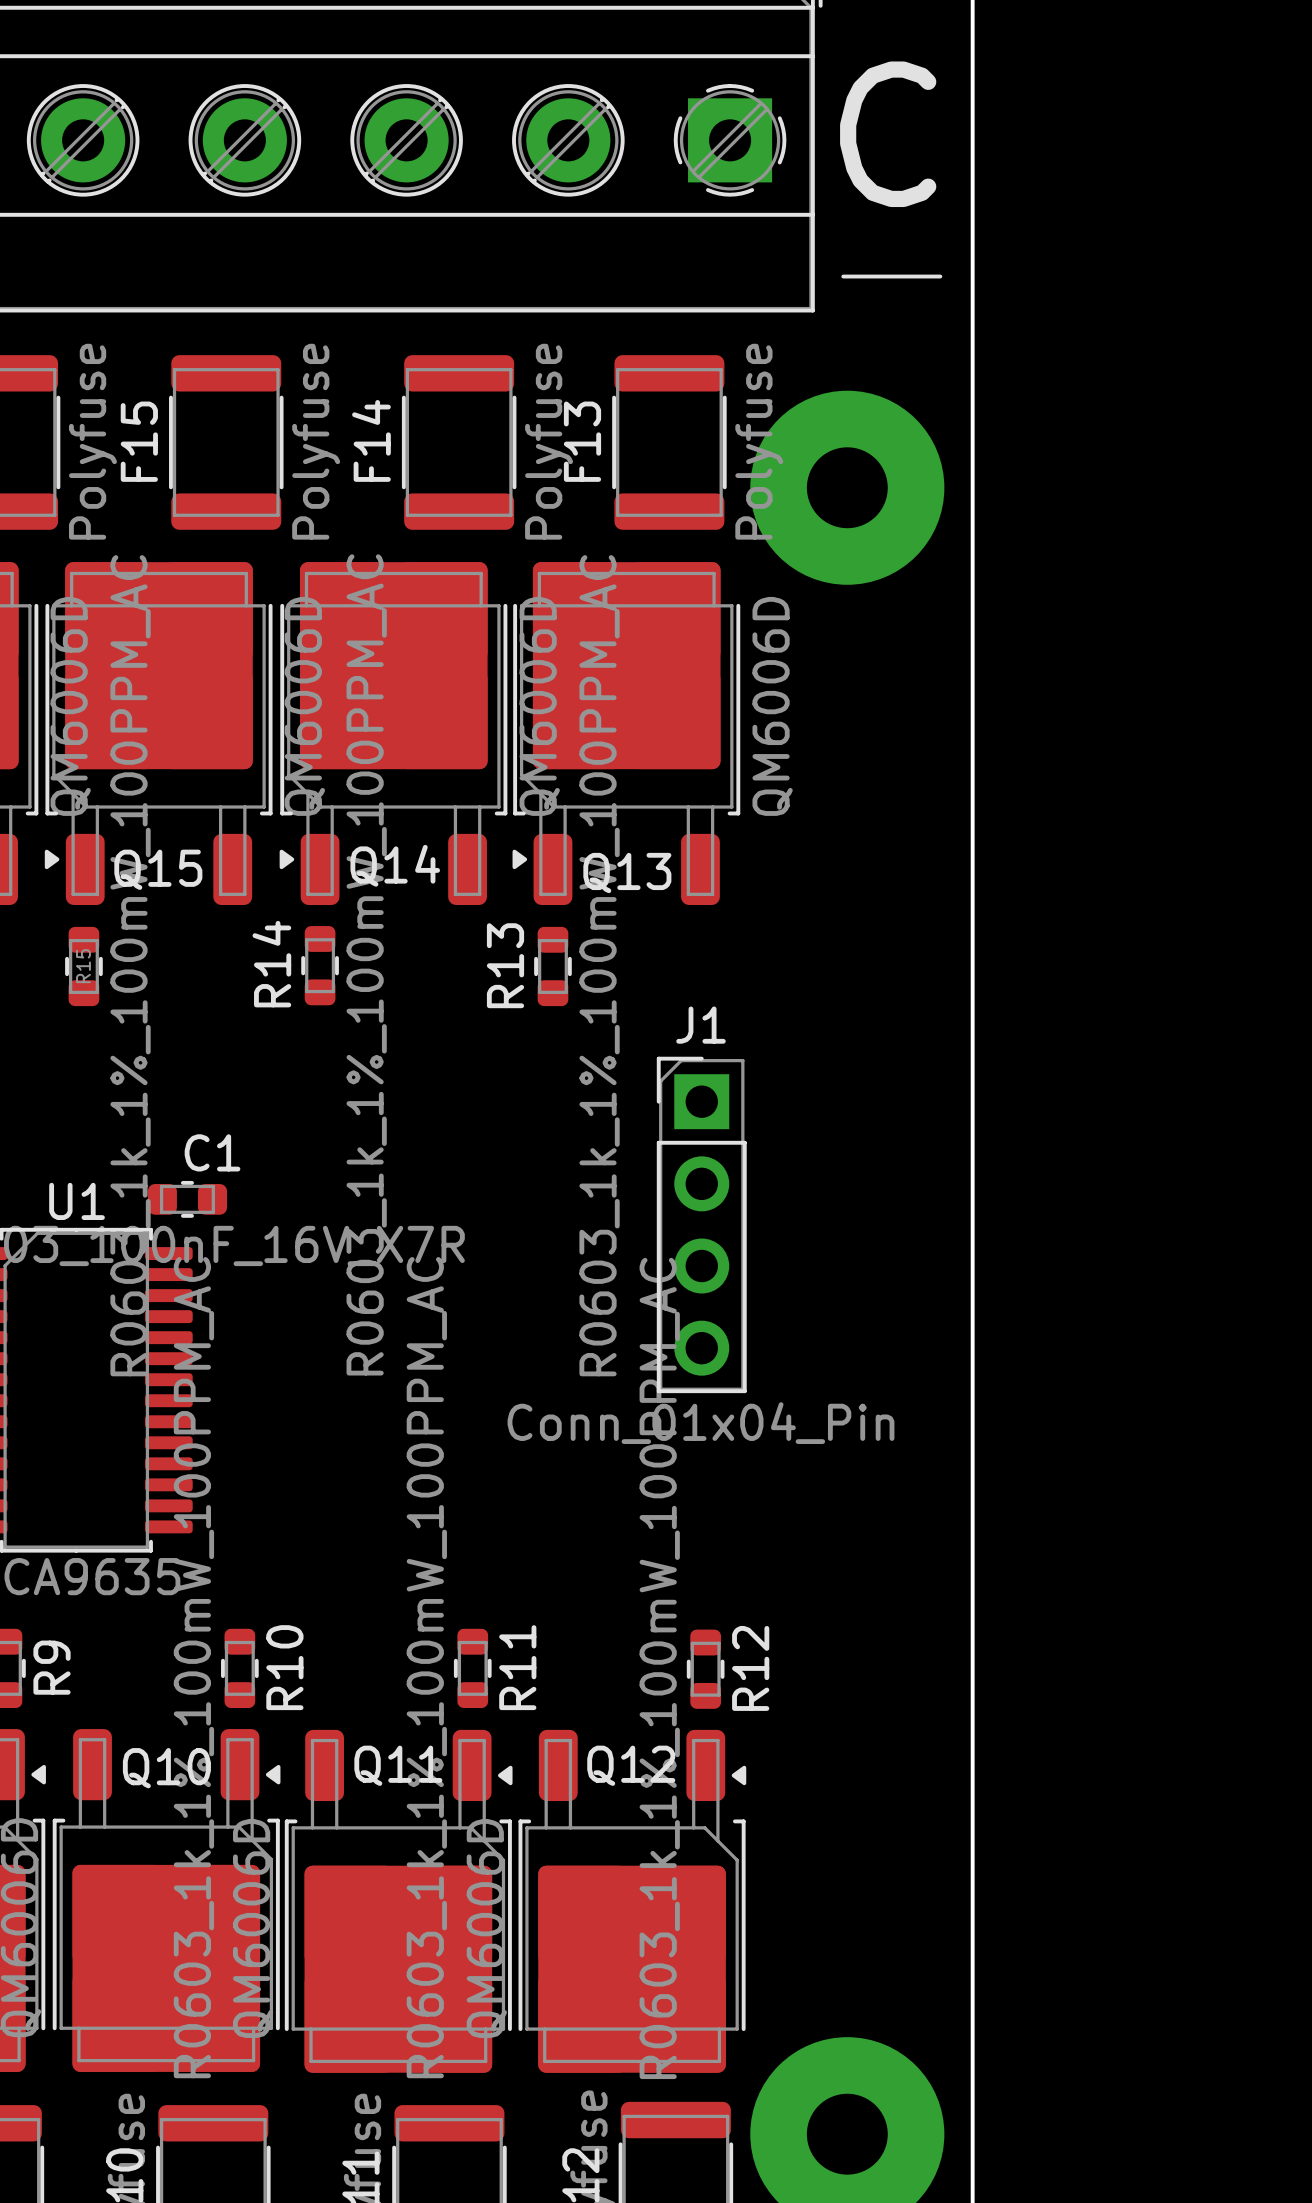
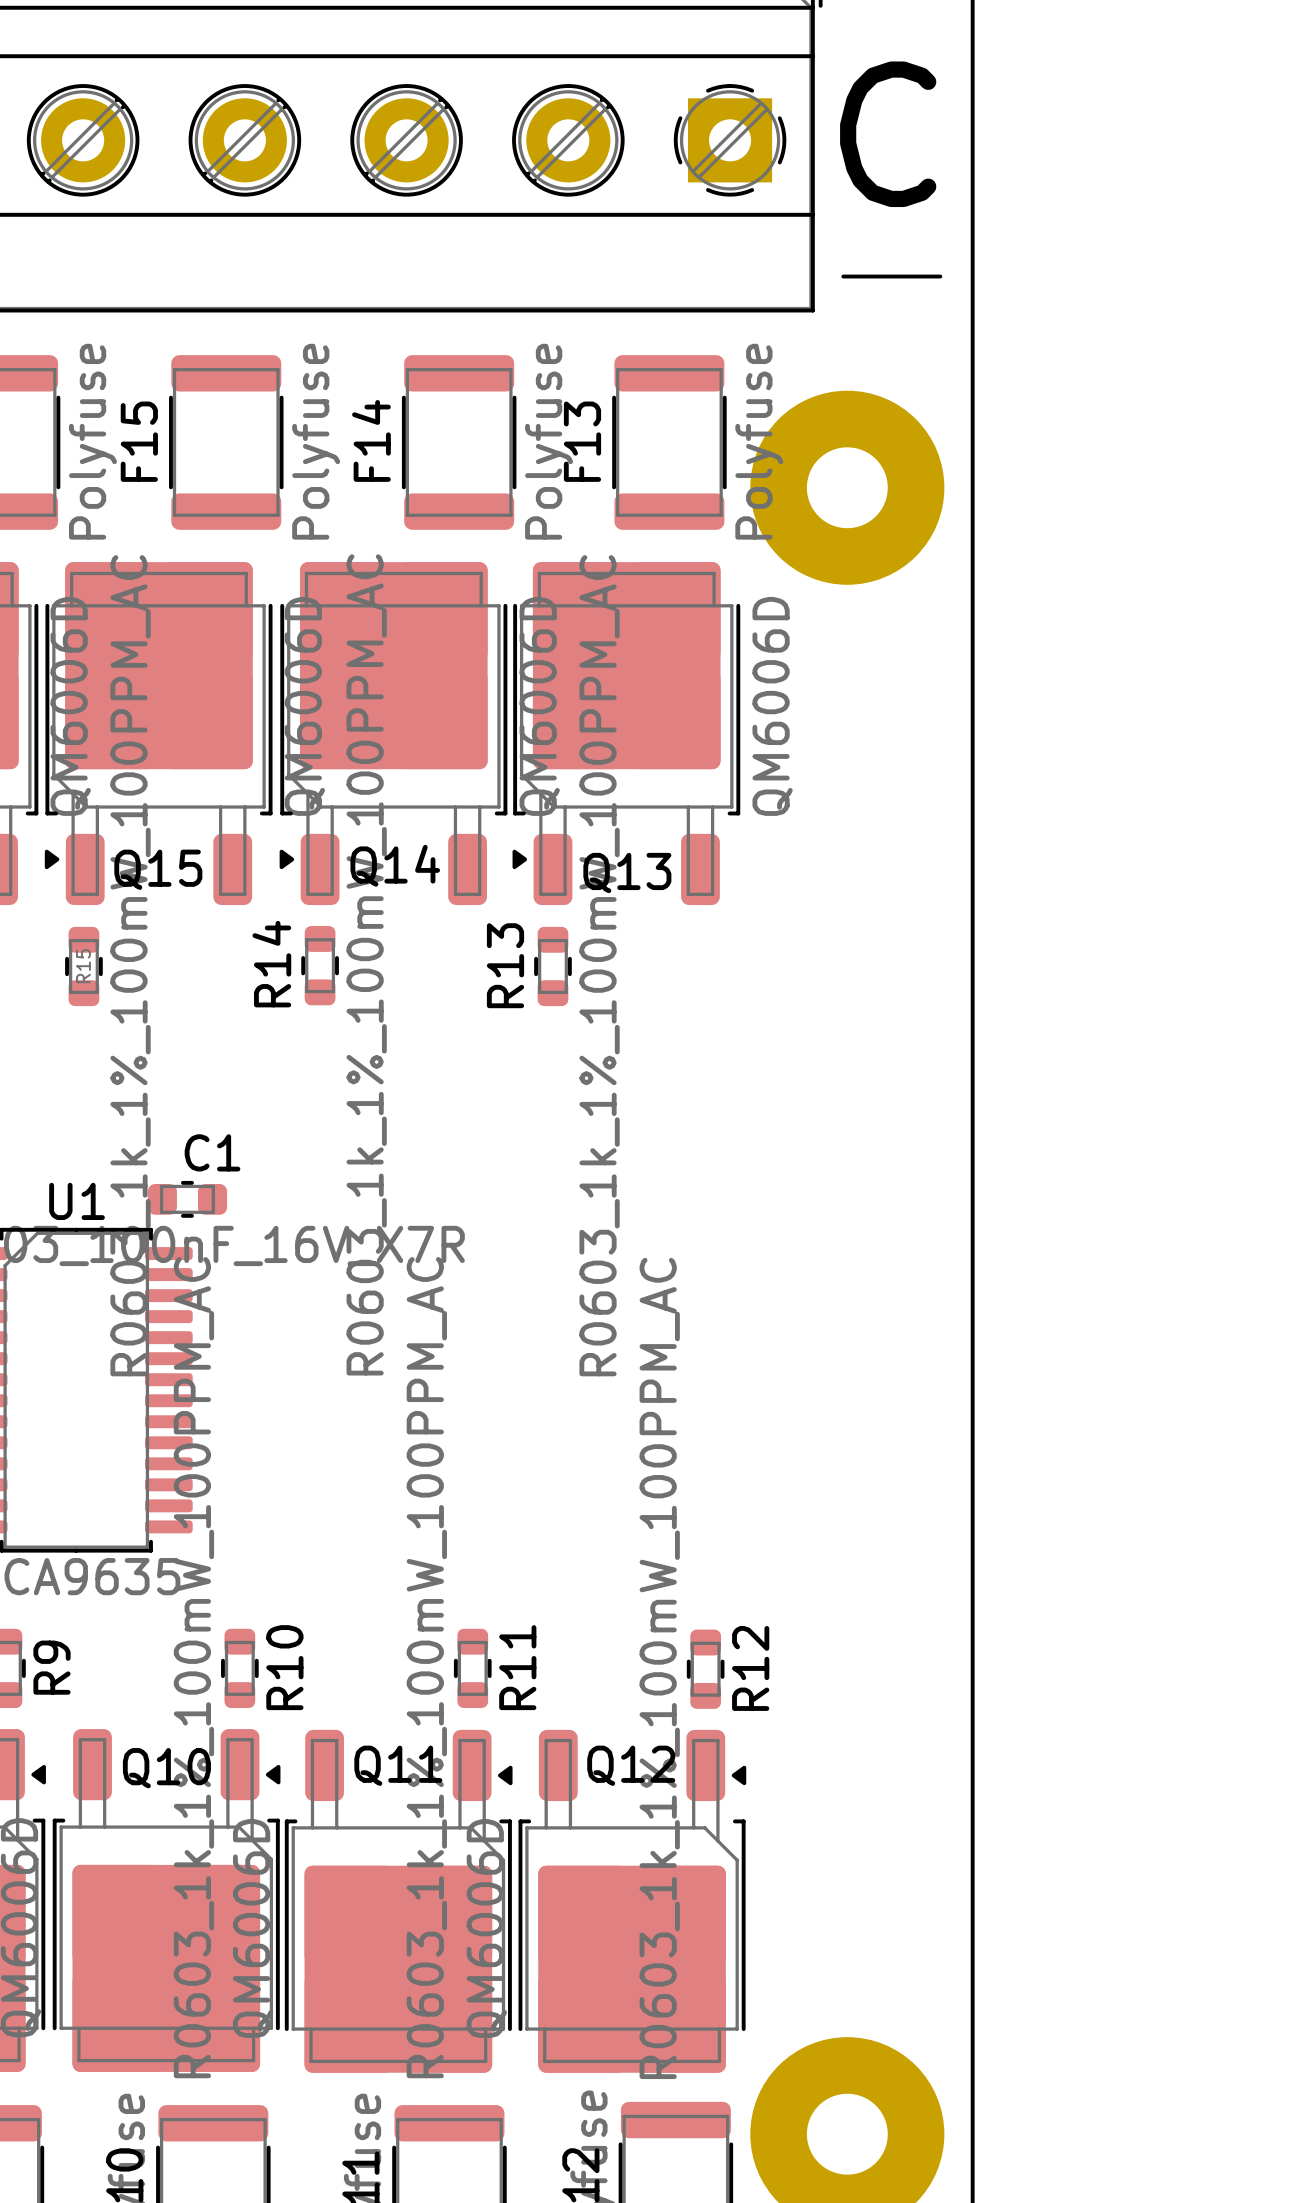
J1: Conn_01x04_Pin (701, 1224) -> none

